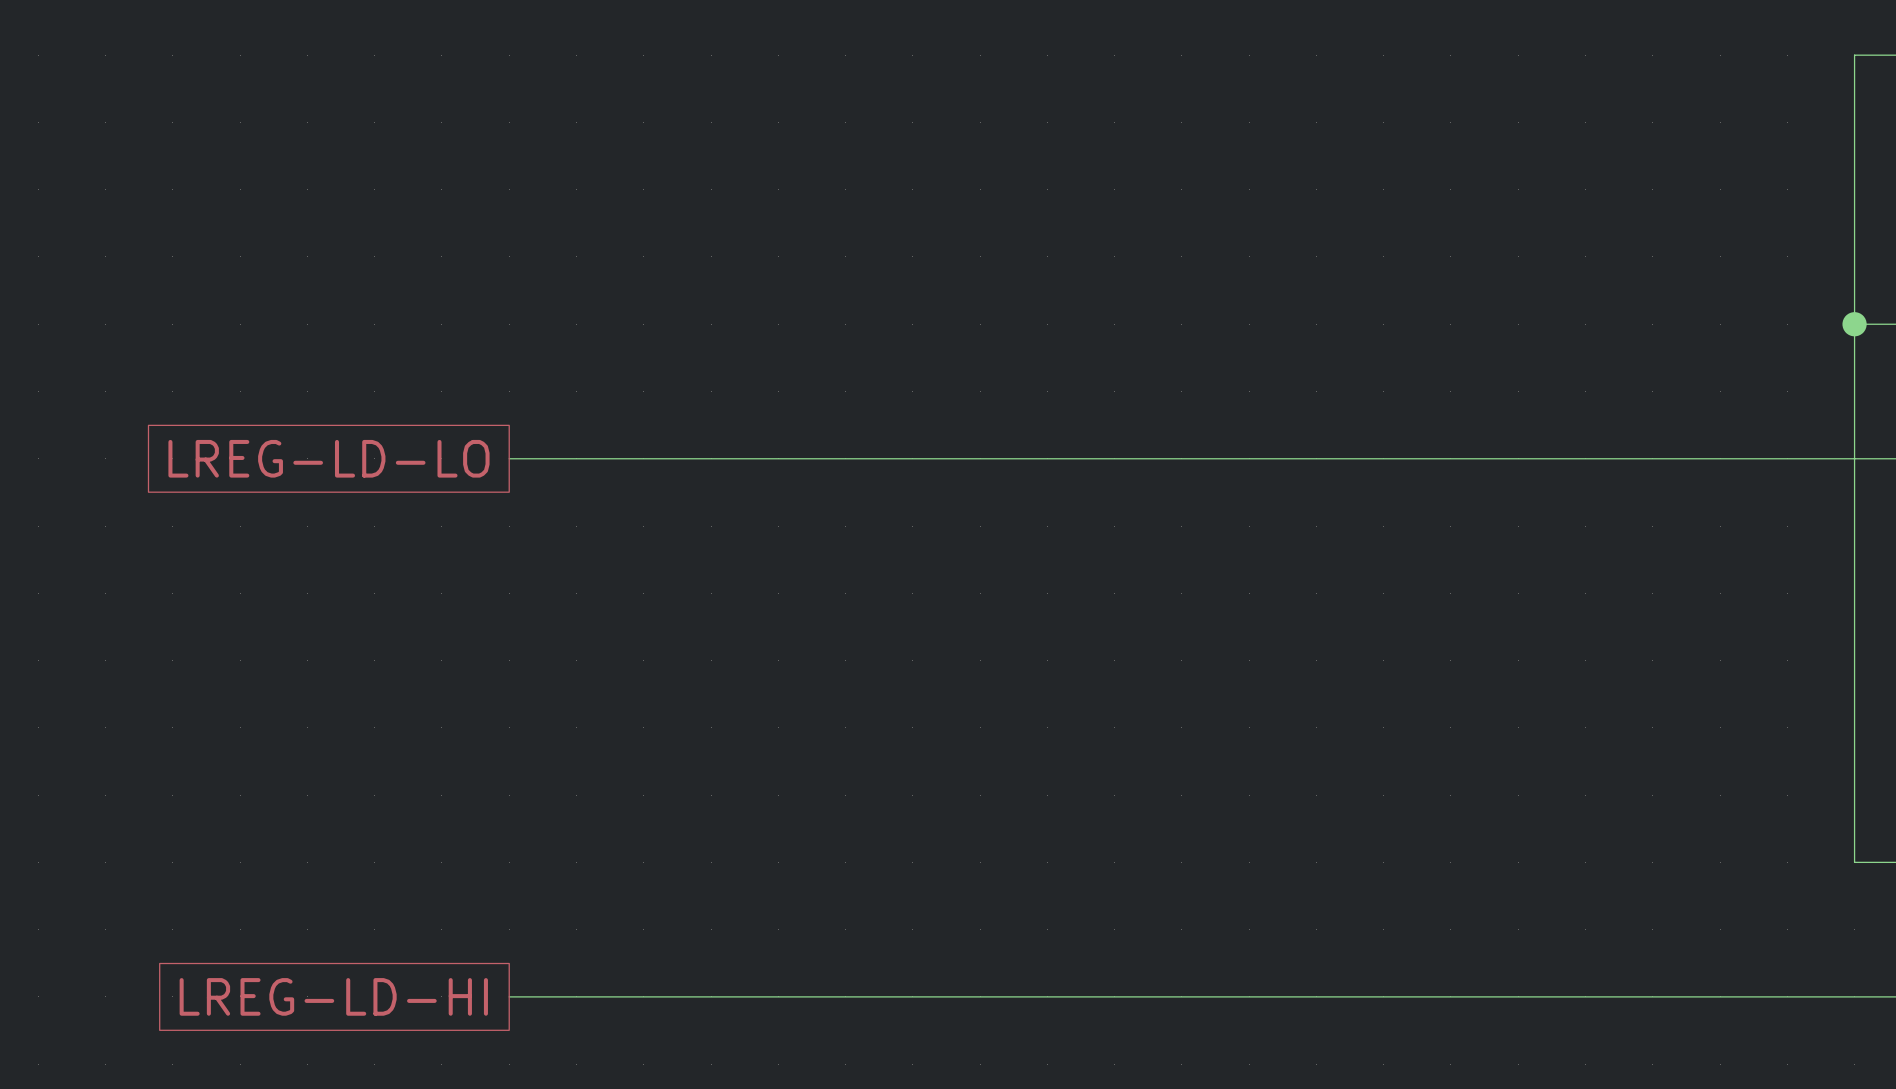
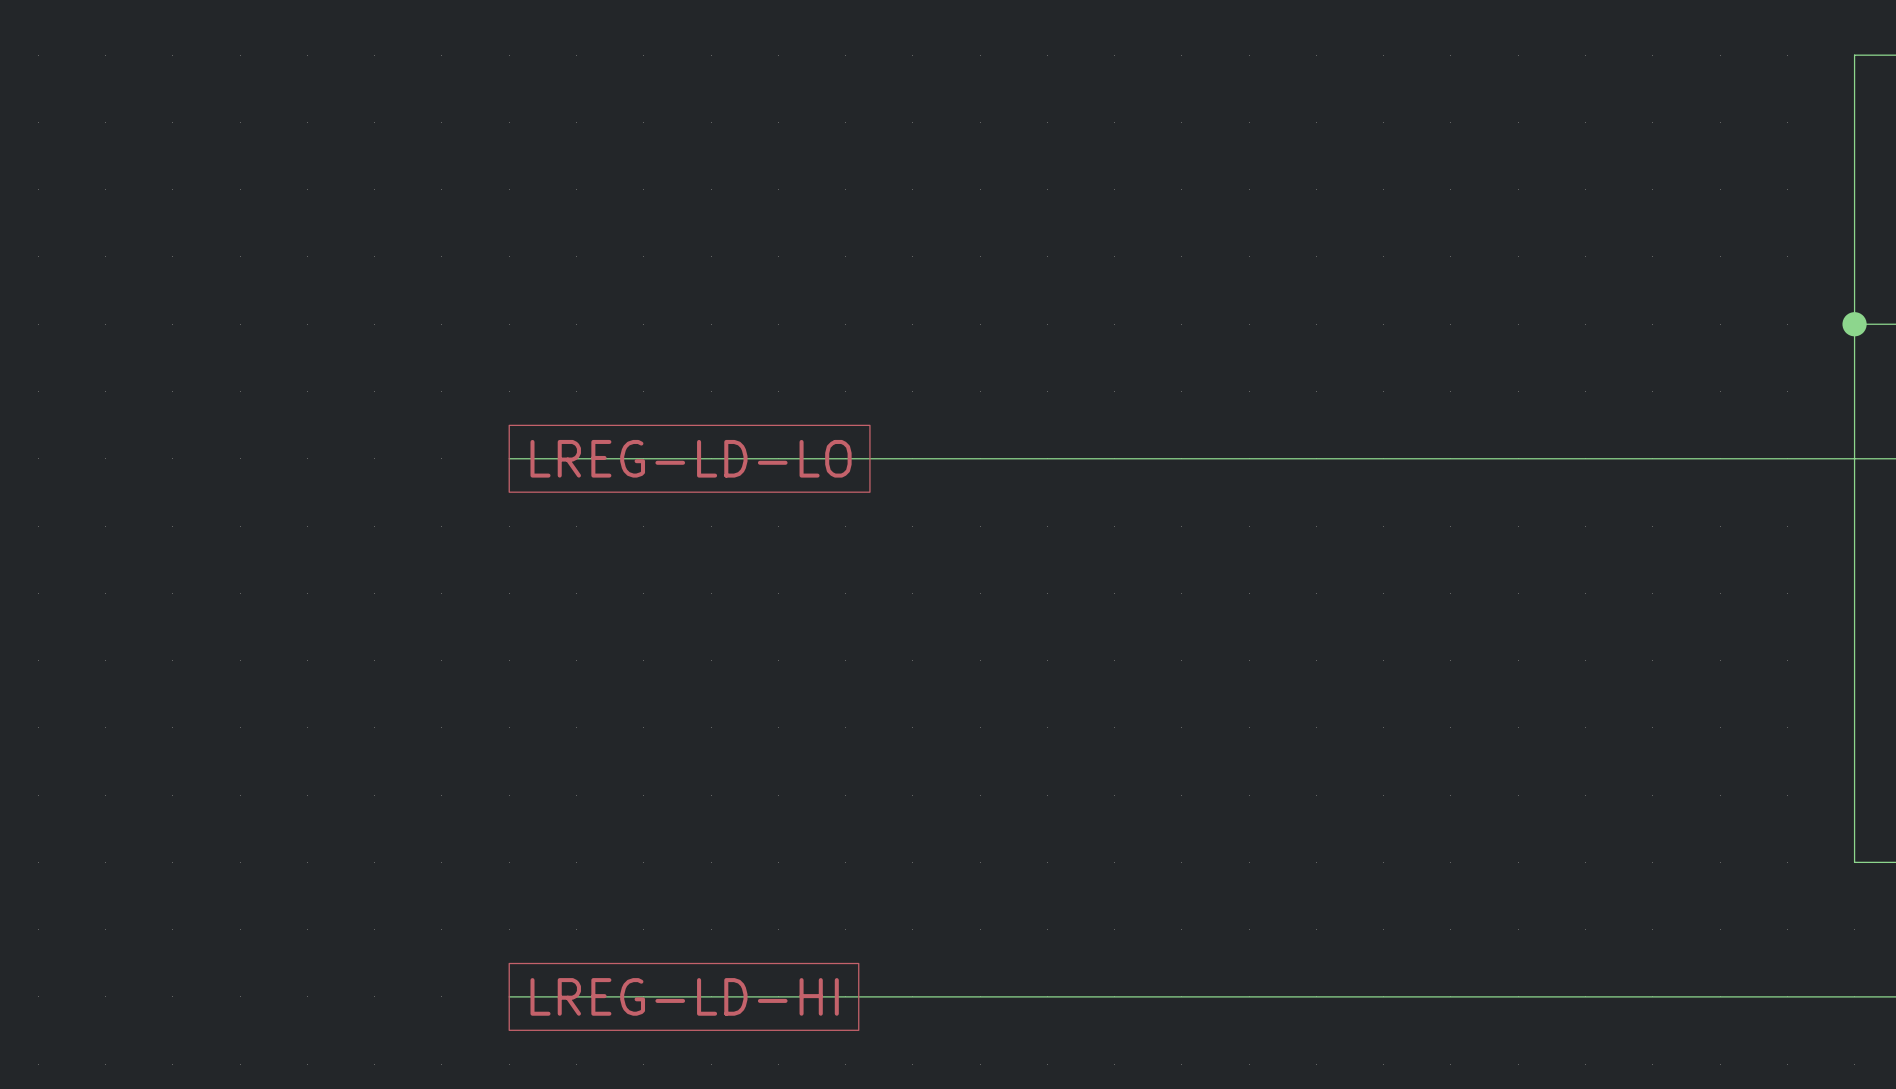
global label rotation: 0° (328, 458) -> 180° (691, 458)
global label rotation: 0° (333, 996) -> 180° (684, 996)

